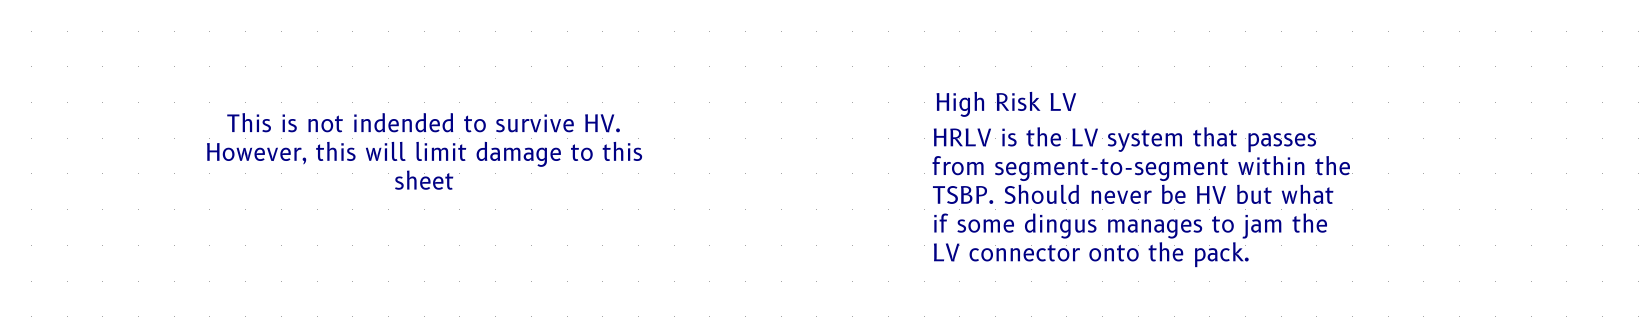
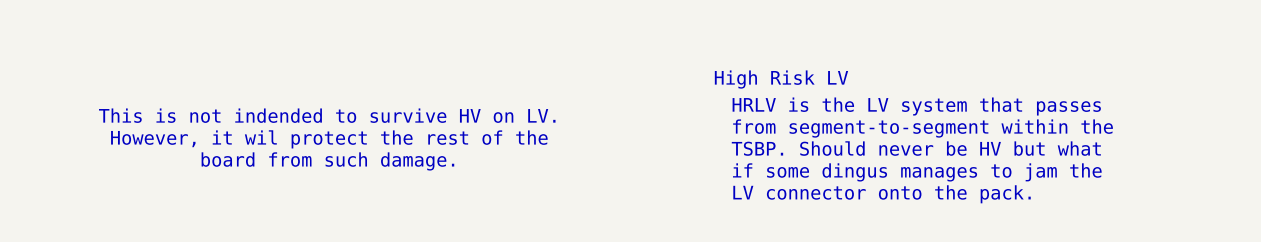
text: This is not indended to survive HV. (423, 122) -> none
text: However, this will limit damage to this (424, 154) -> This is not indended to survive HV on LV. (327, 115)
text: sheet (424, 180) -> However, it wil protect the rest of the (329, 139)
text: none -> board from such damage. (327, 161)

